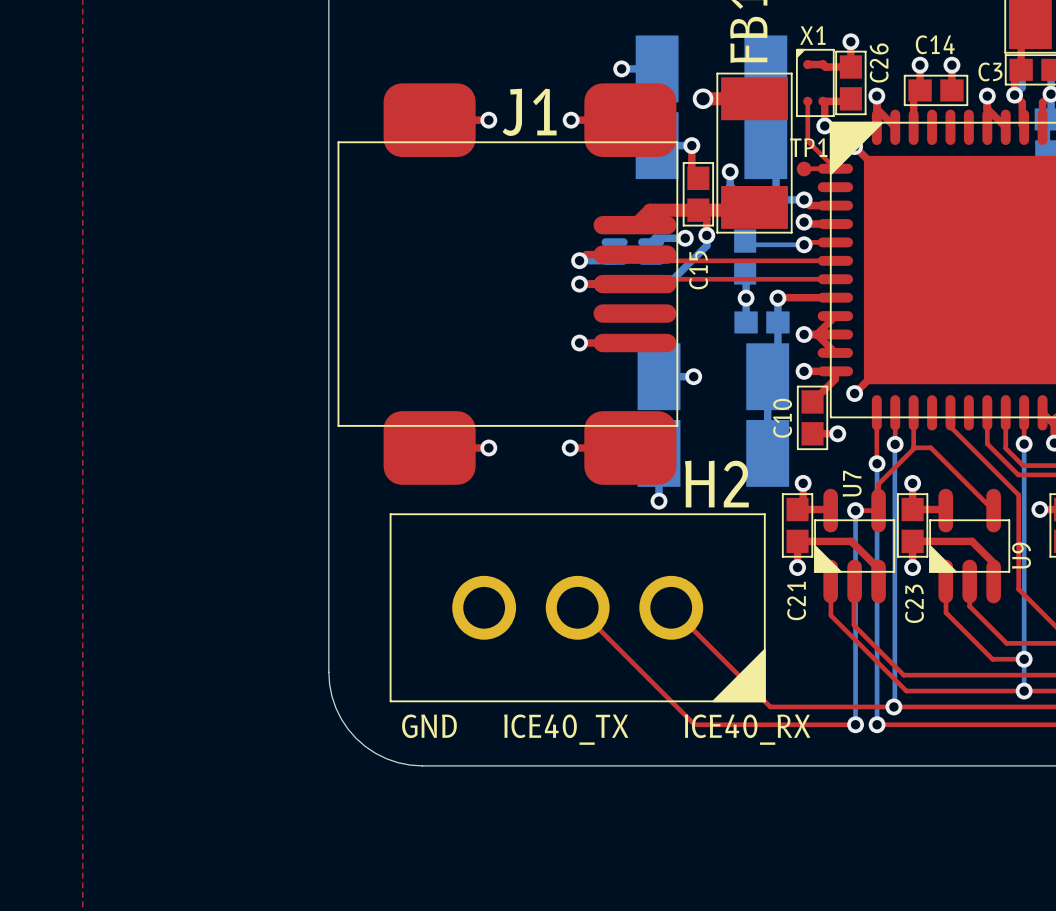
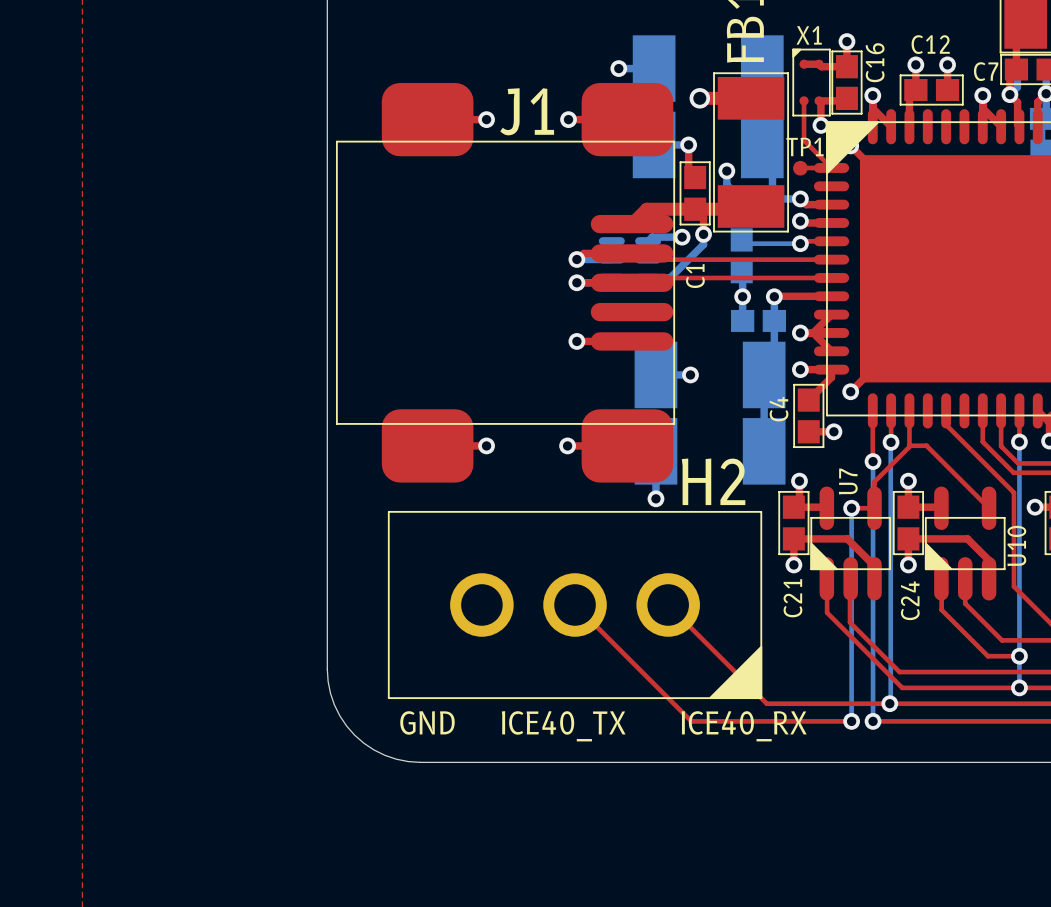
C14 name: C14 (935, 44) -> C12 (930, 44)
C26 name: C26 (879, 62) -> C16 (875, 62)
C3 name: C3 (990, 71) -> C7 (986, 71)
C15 name: C15 (698, 270) -> C1 (695, 276)
C10 name: C10 (782, 418) -> C4 (778, 409)
U9 name: U9 (1021, 555) -> U10 (1016, 546)
C23 name: C23 (914, 603) -> C24 (910, 600)

